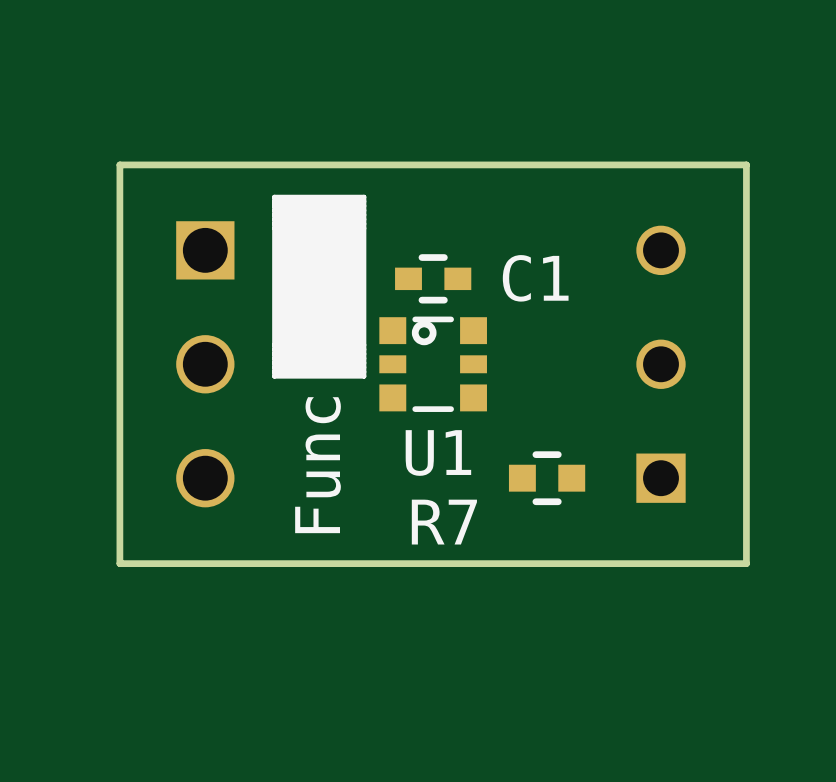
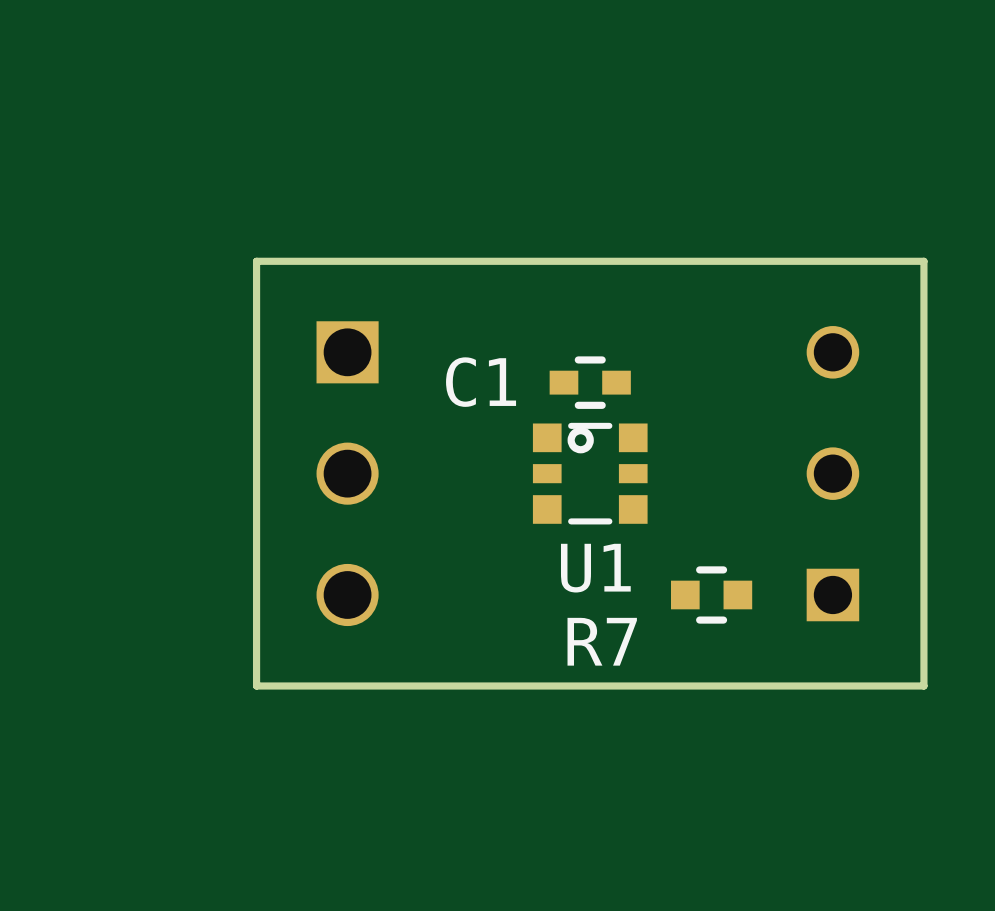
drawing: [272, 194, 367, 379] -> none
C1 name position: C1 (535, 278) -> C1 (481, 382)

